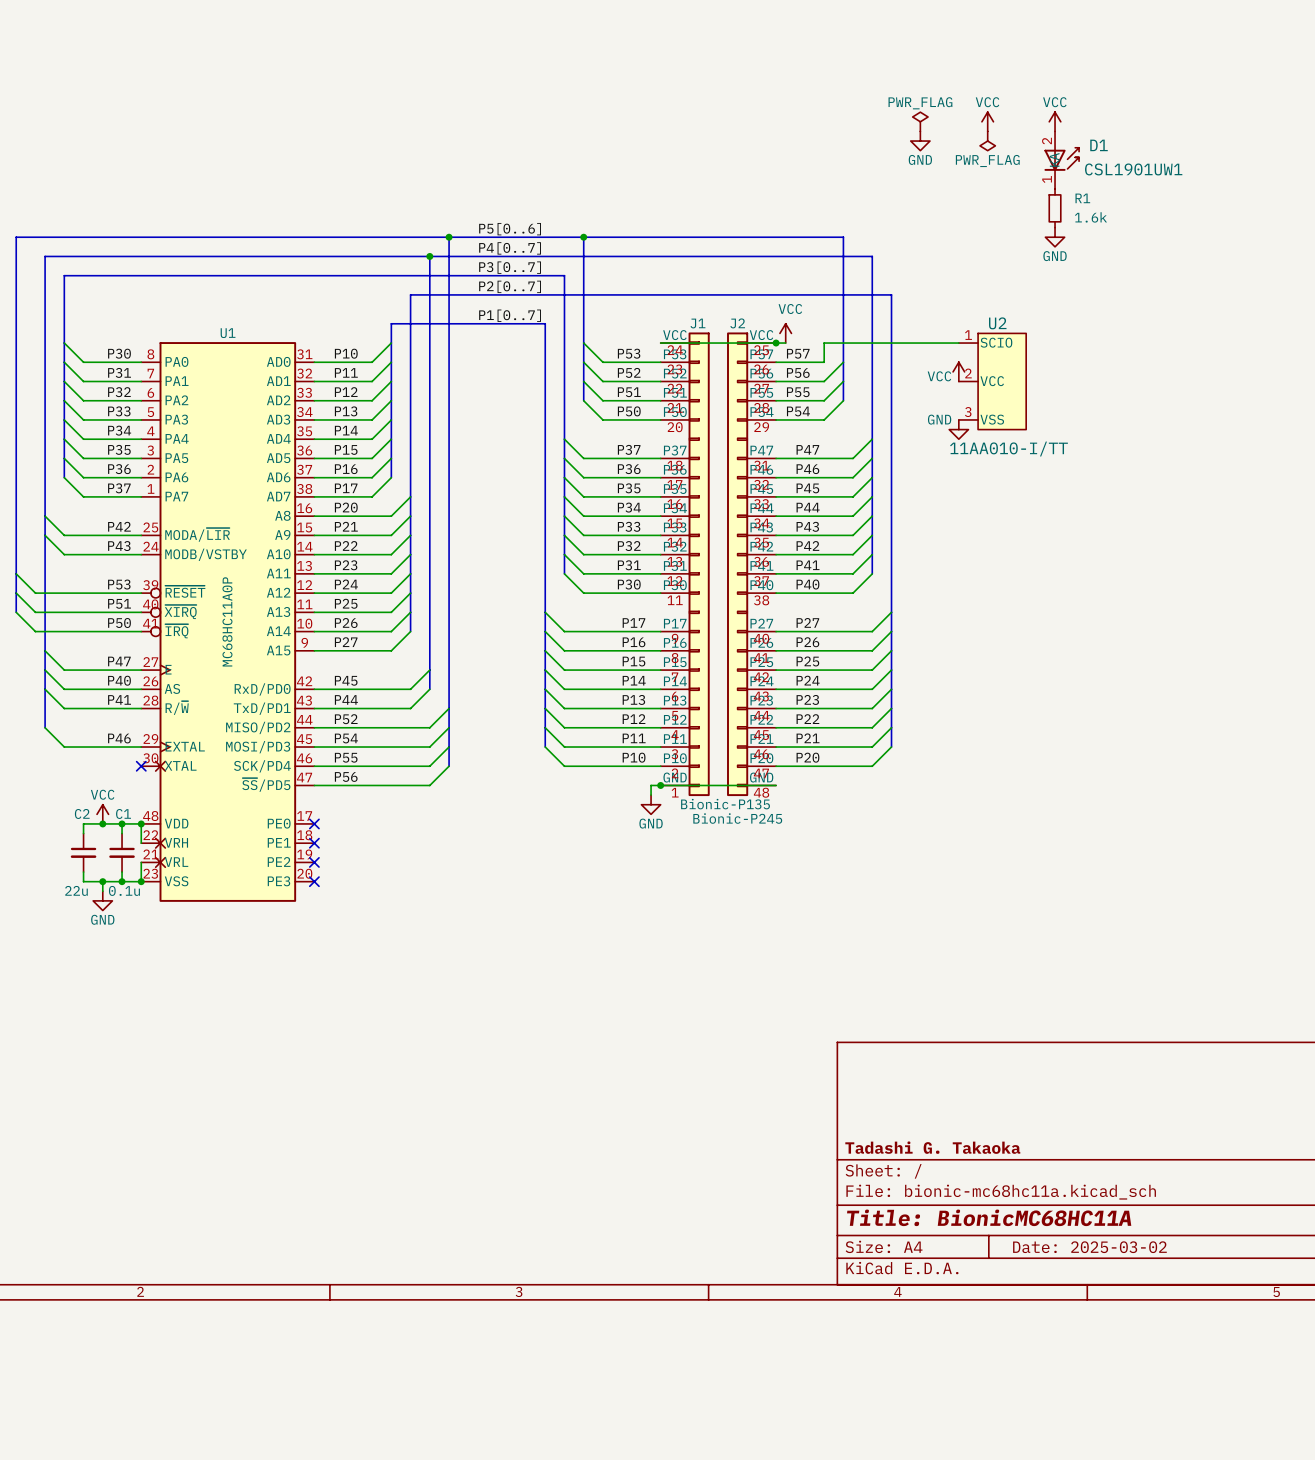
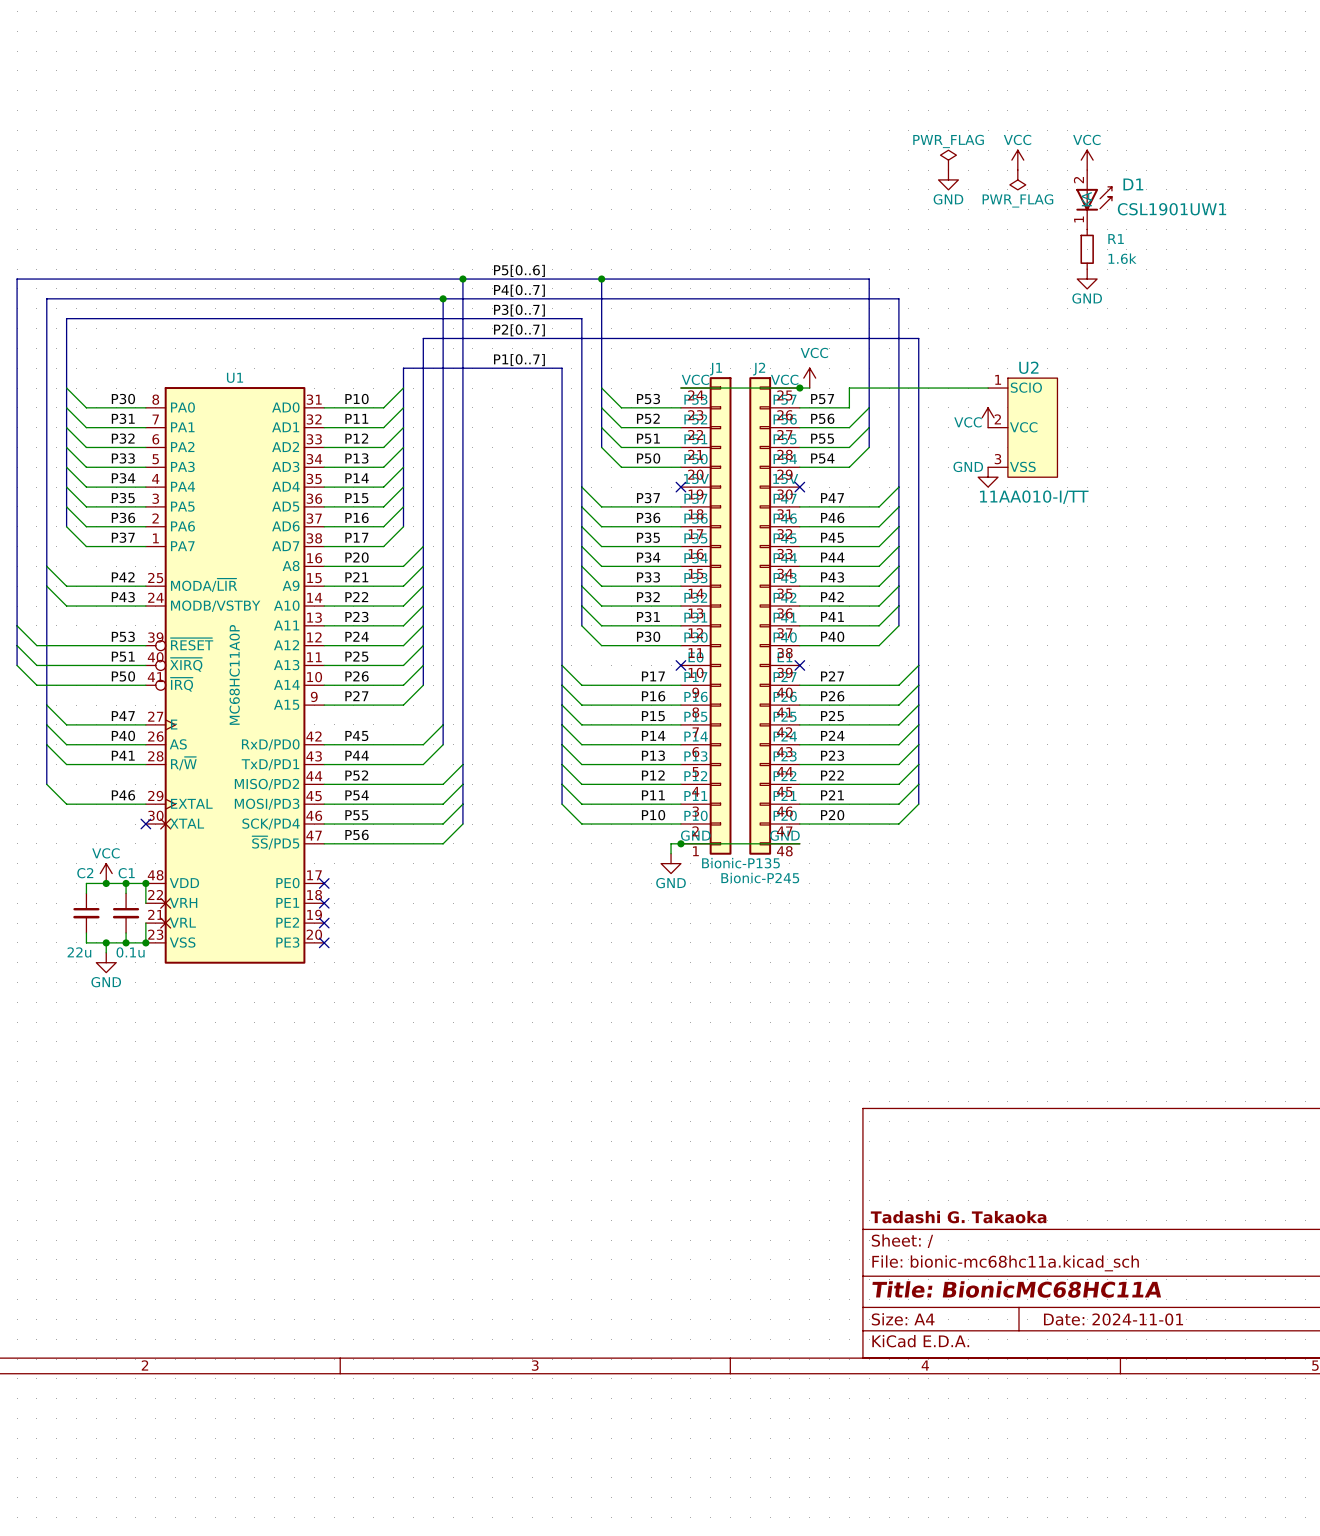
J1 symbol: [660, 332, 710, 797] -> [680, 377, 732, 855]
J2 symbol: [727, 332, 777, 797] -> [749, 377, 800, 855]
no-connect mark: none -> (680, 487)
no-connect mark: none -> (799, 487)
no-connect mark: none -> (680, 665)
no-connect mark: none -> (799, 665)
title block: Date: 2025-03-02 (1089, 1247) -> Date: 2024-11-01 (1113, 1319)

